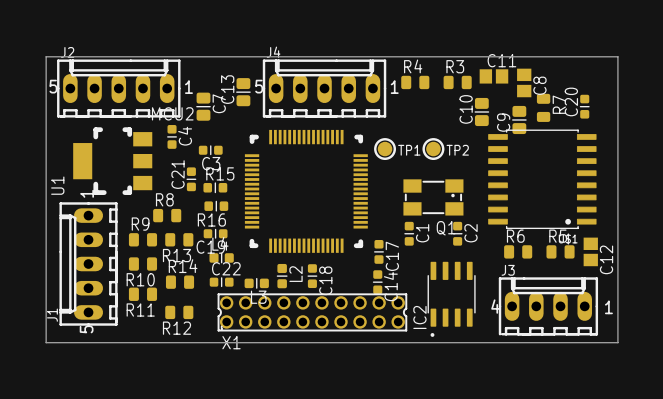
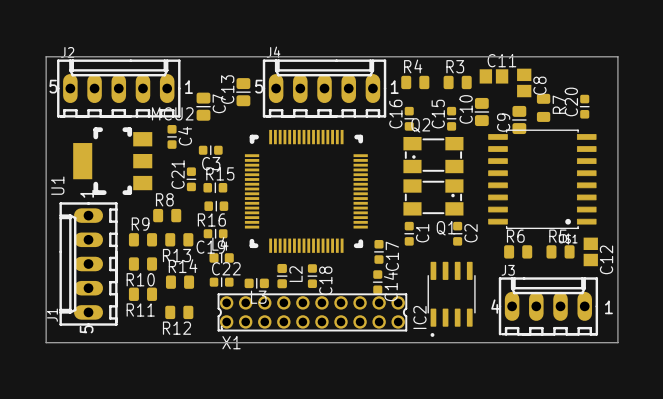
C16: none -> (409, 118)
C15: none -> (451, 118)
TP1: (385, 149) -> none
TP2: (433, 149) -> none
Q2: none -> (433, 155)

